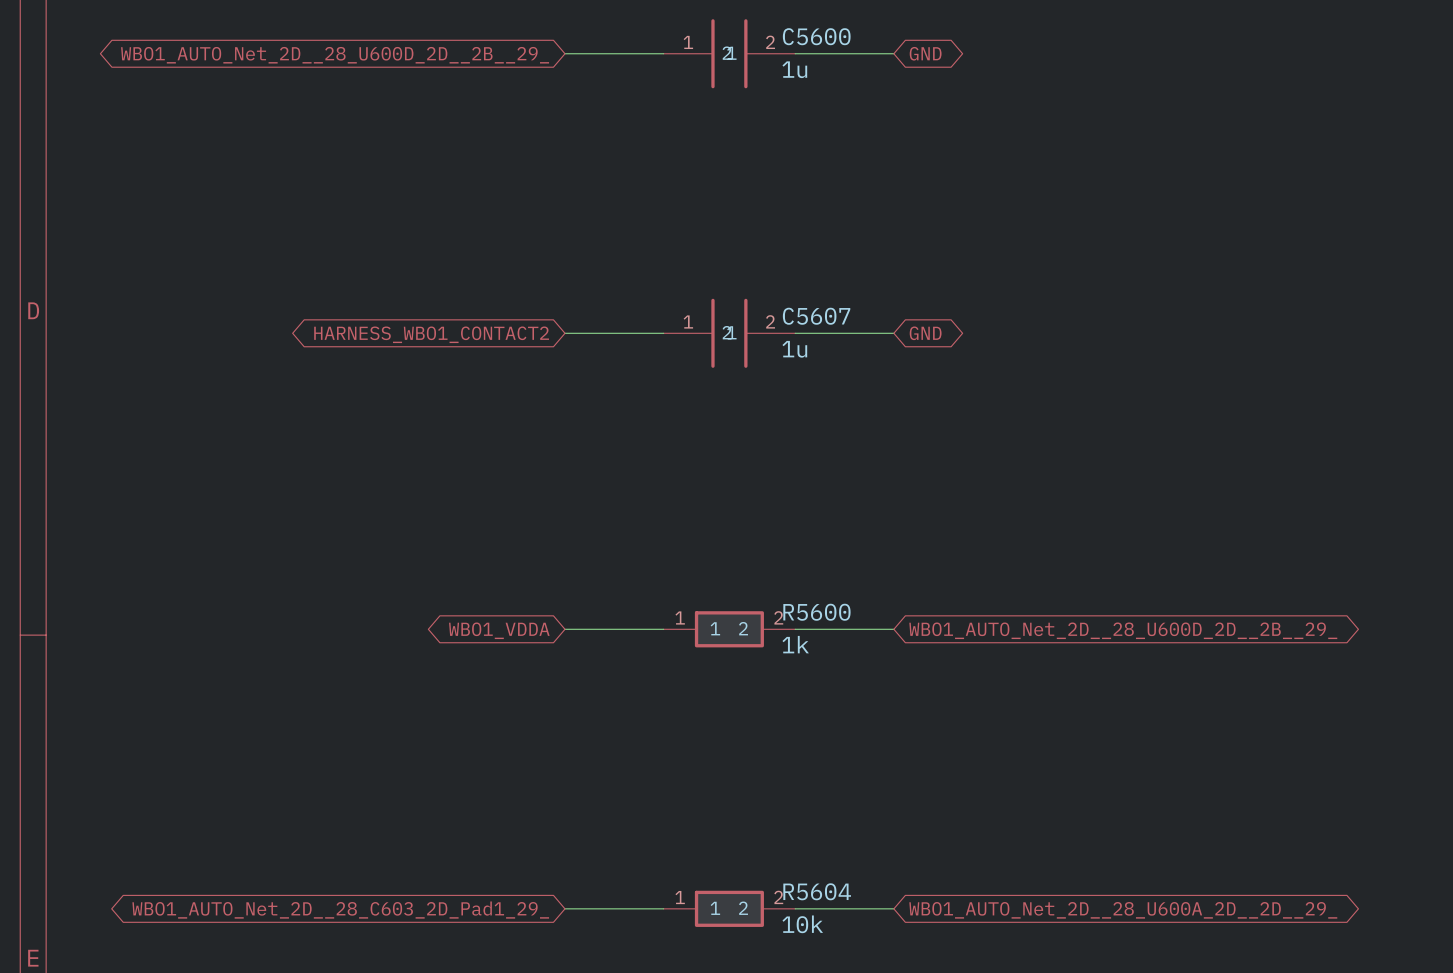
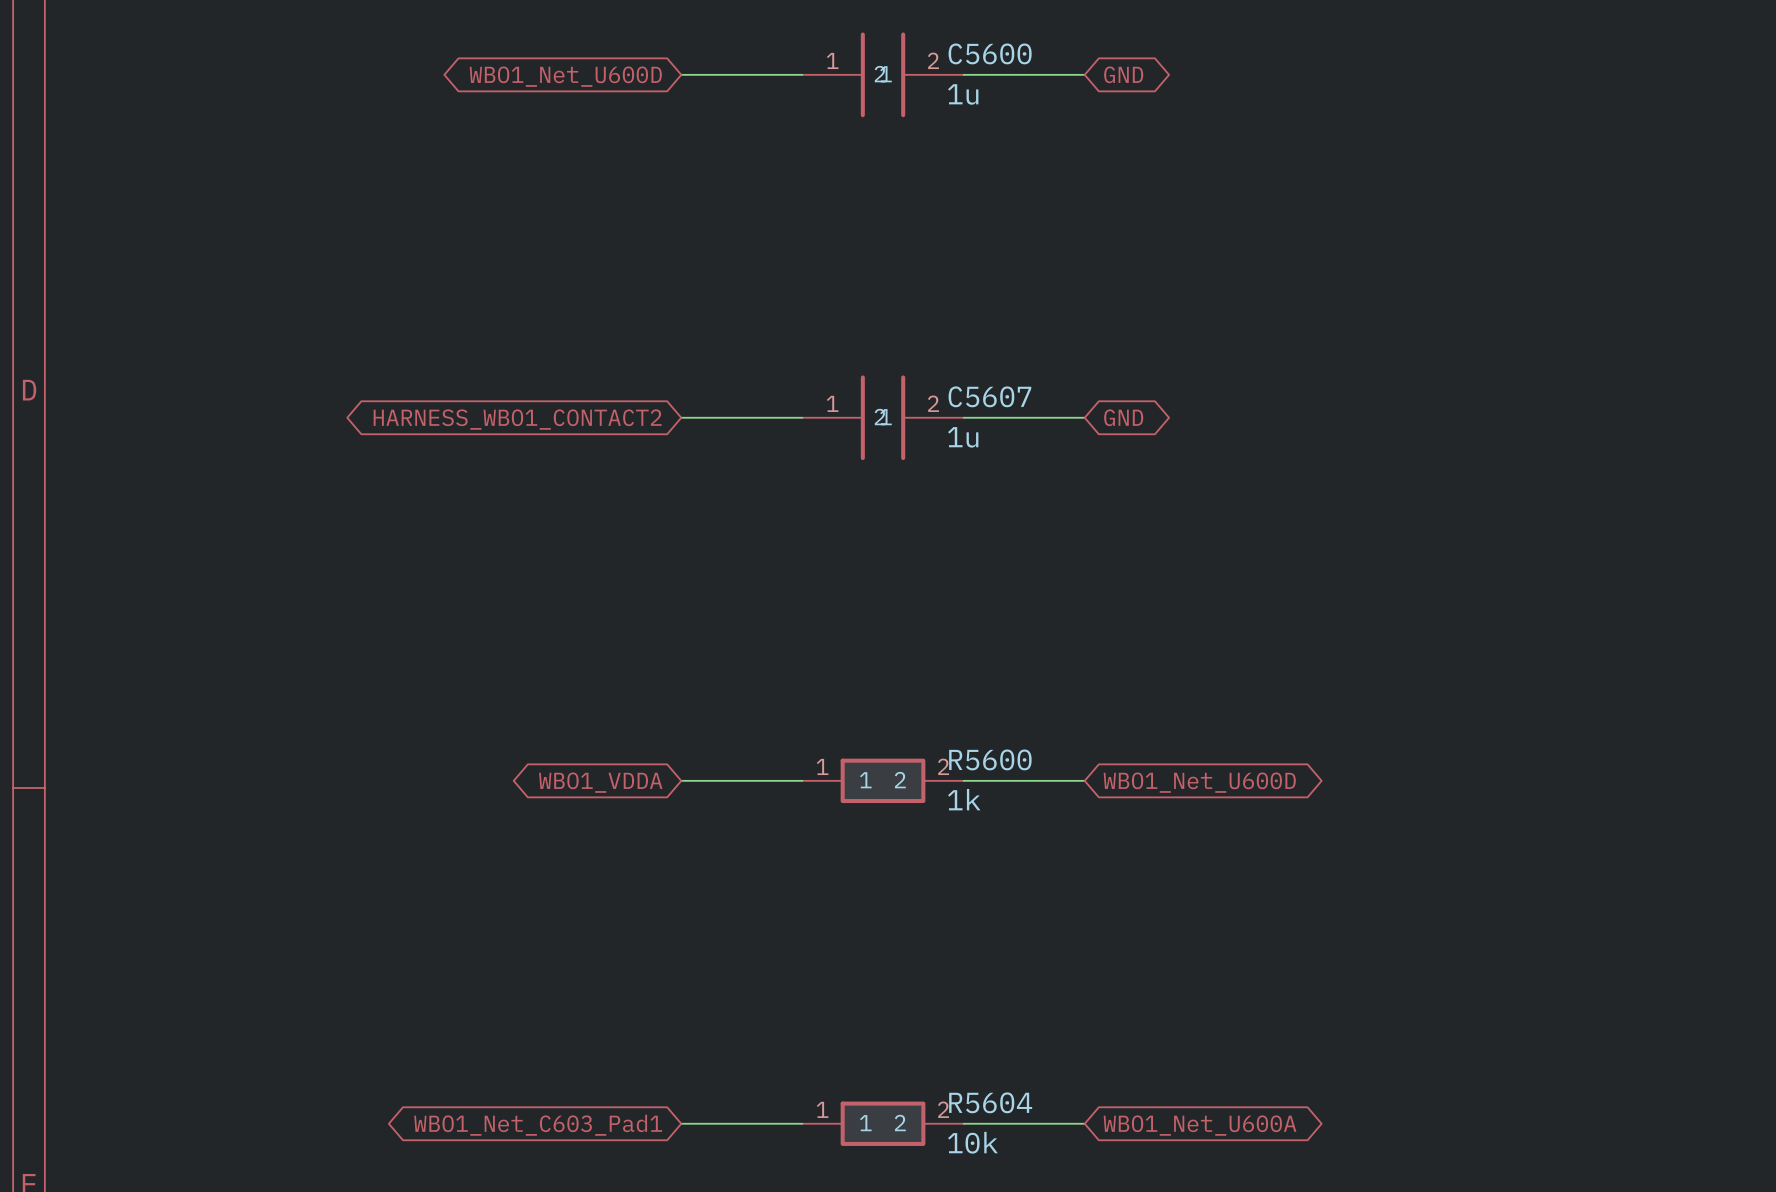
global label: WBO1_AUTO_Net_2D__28_U600D_2D__2B__29_ (335, 55) -> WBO1_Net_U600D (565, 76)
global label: WBO1_AUTO_Net_2D__28_U600D_2D__2B__29_ (1123, 630) -> WBO1_Net_U600D (1199, 782)
global label: WBO1_AUTO_Net_2D__28_C603_2D_Pad1_29_ (340, 910) -> WBO1_Net_C603_Pad1 (538, 1125)
global label: WBO1_AUTO_Net_2D__28_U600A_2D__2D__29_ (1123, 910) -> WBO1_Net_U600A (1200, 1125)

